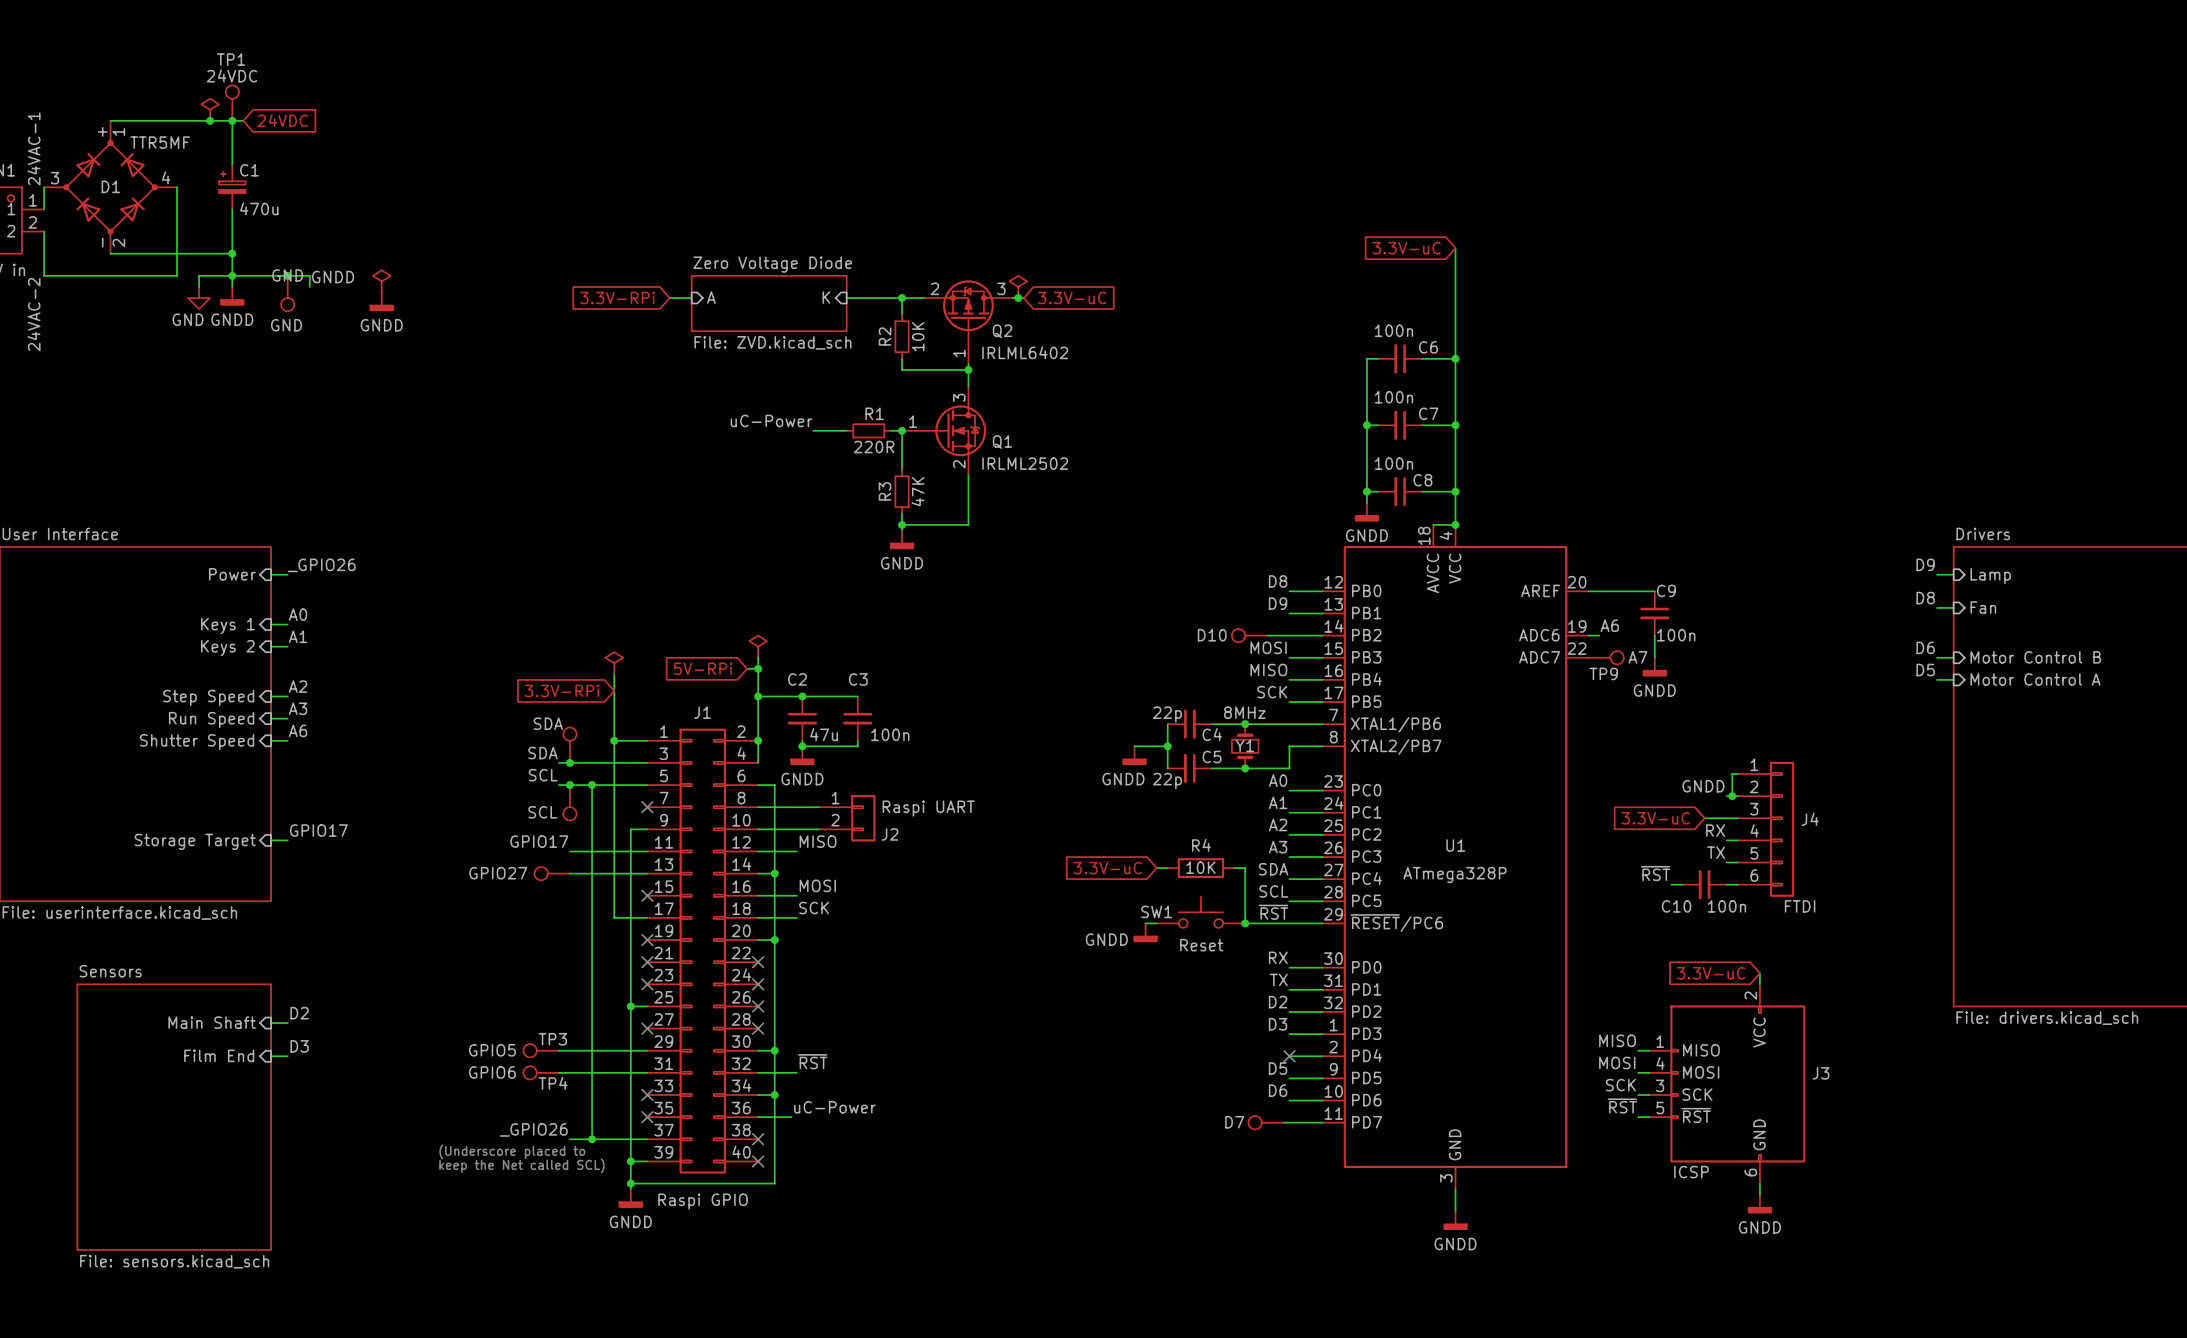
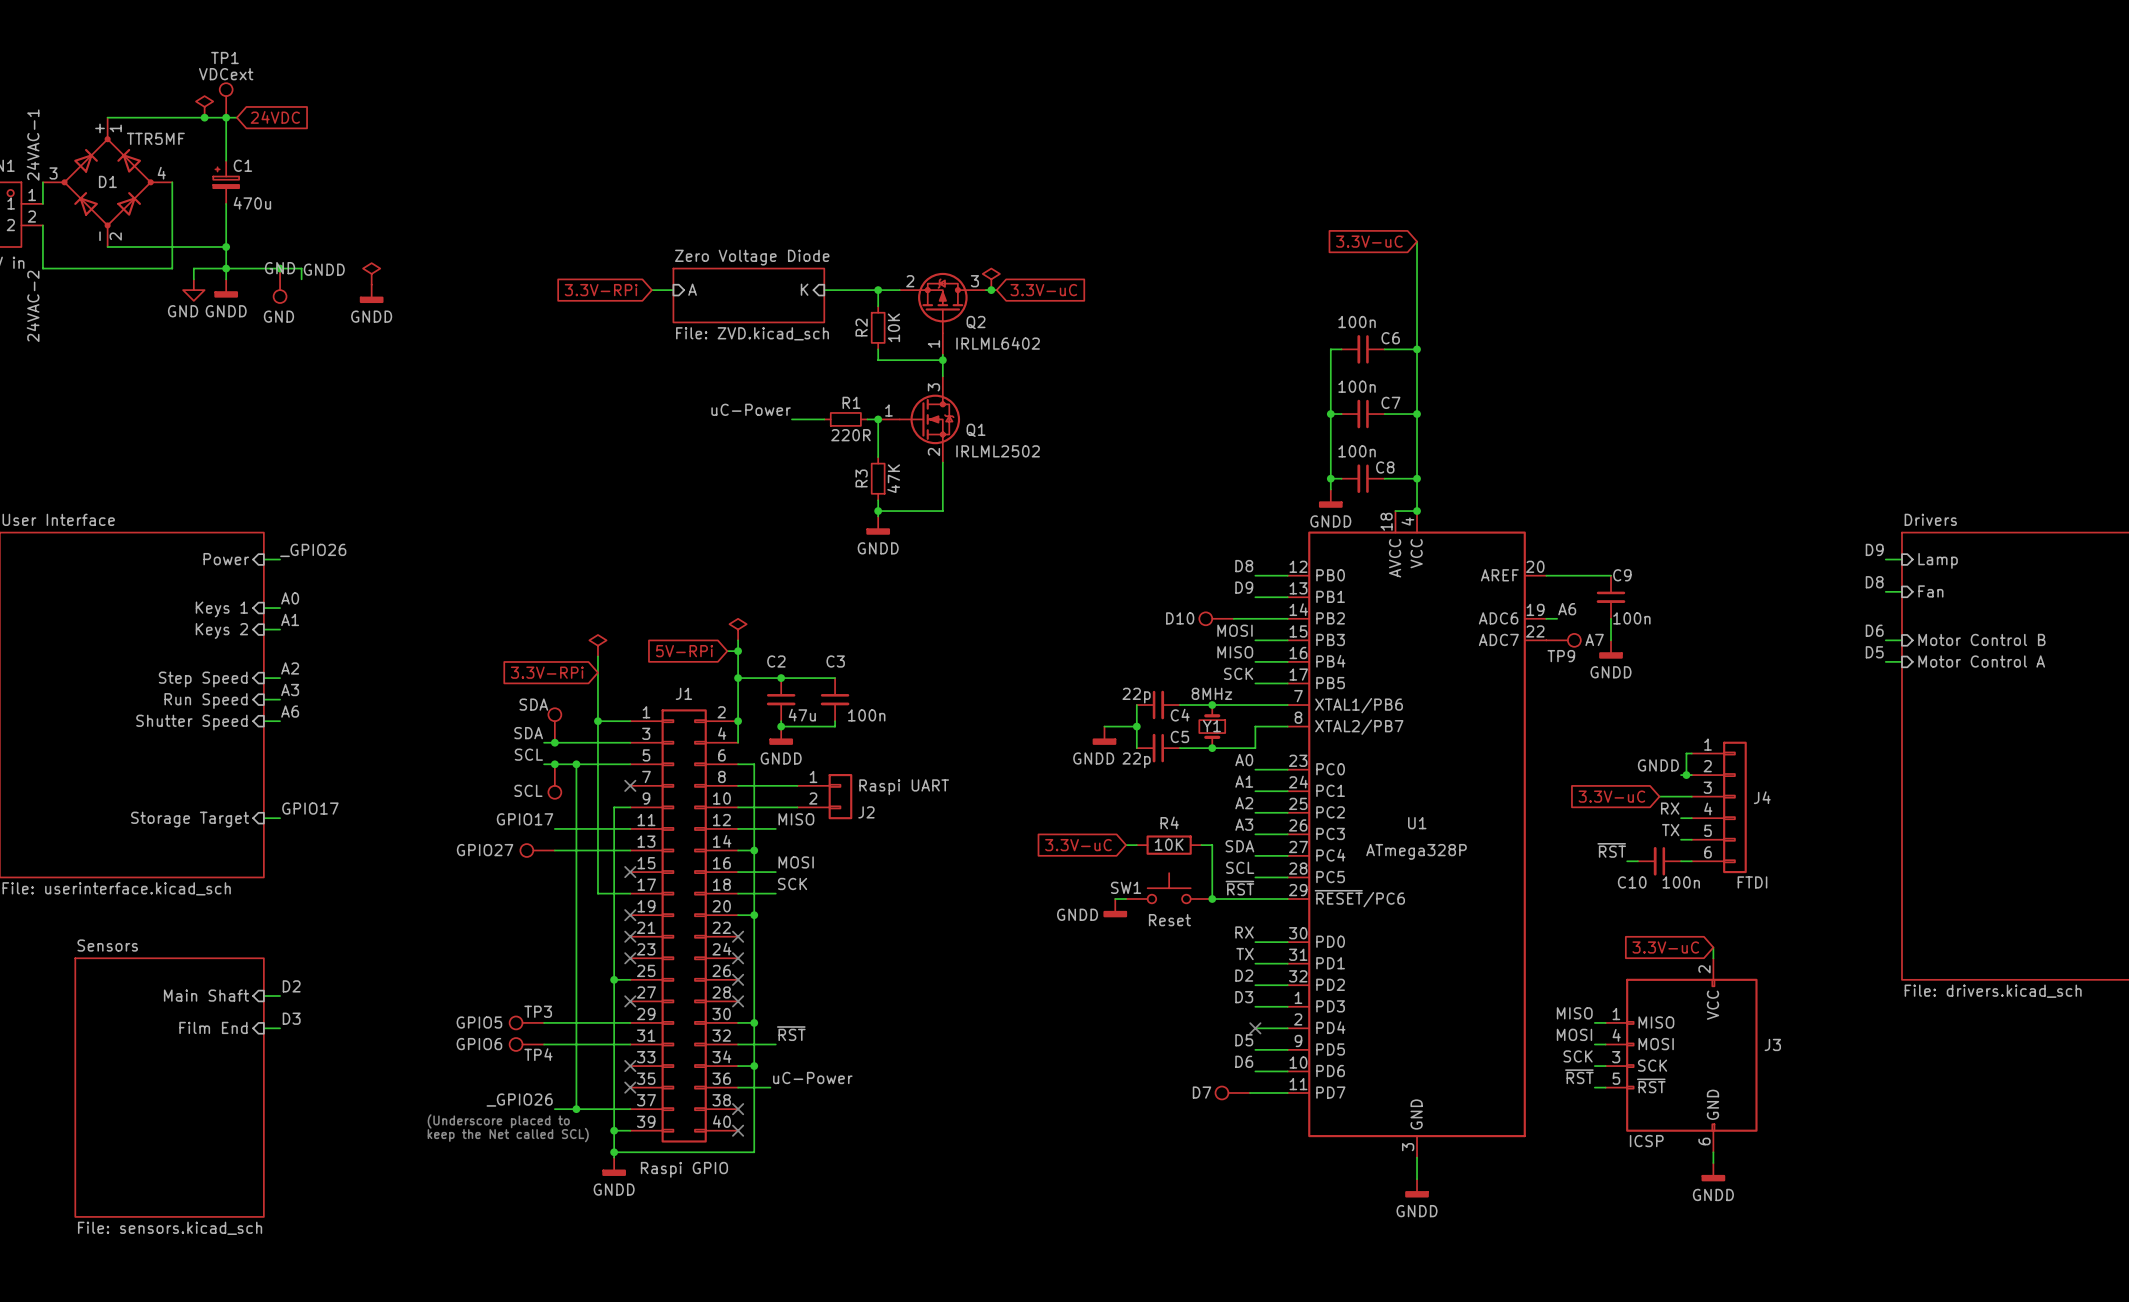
TP1 text: 24VDC (232, 75) -> VDCext (226, 74)

